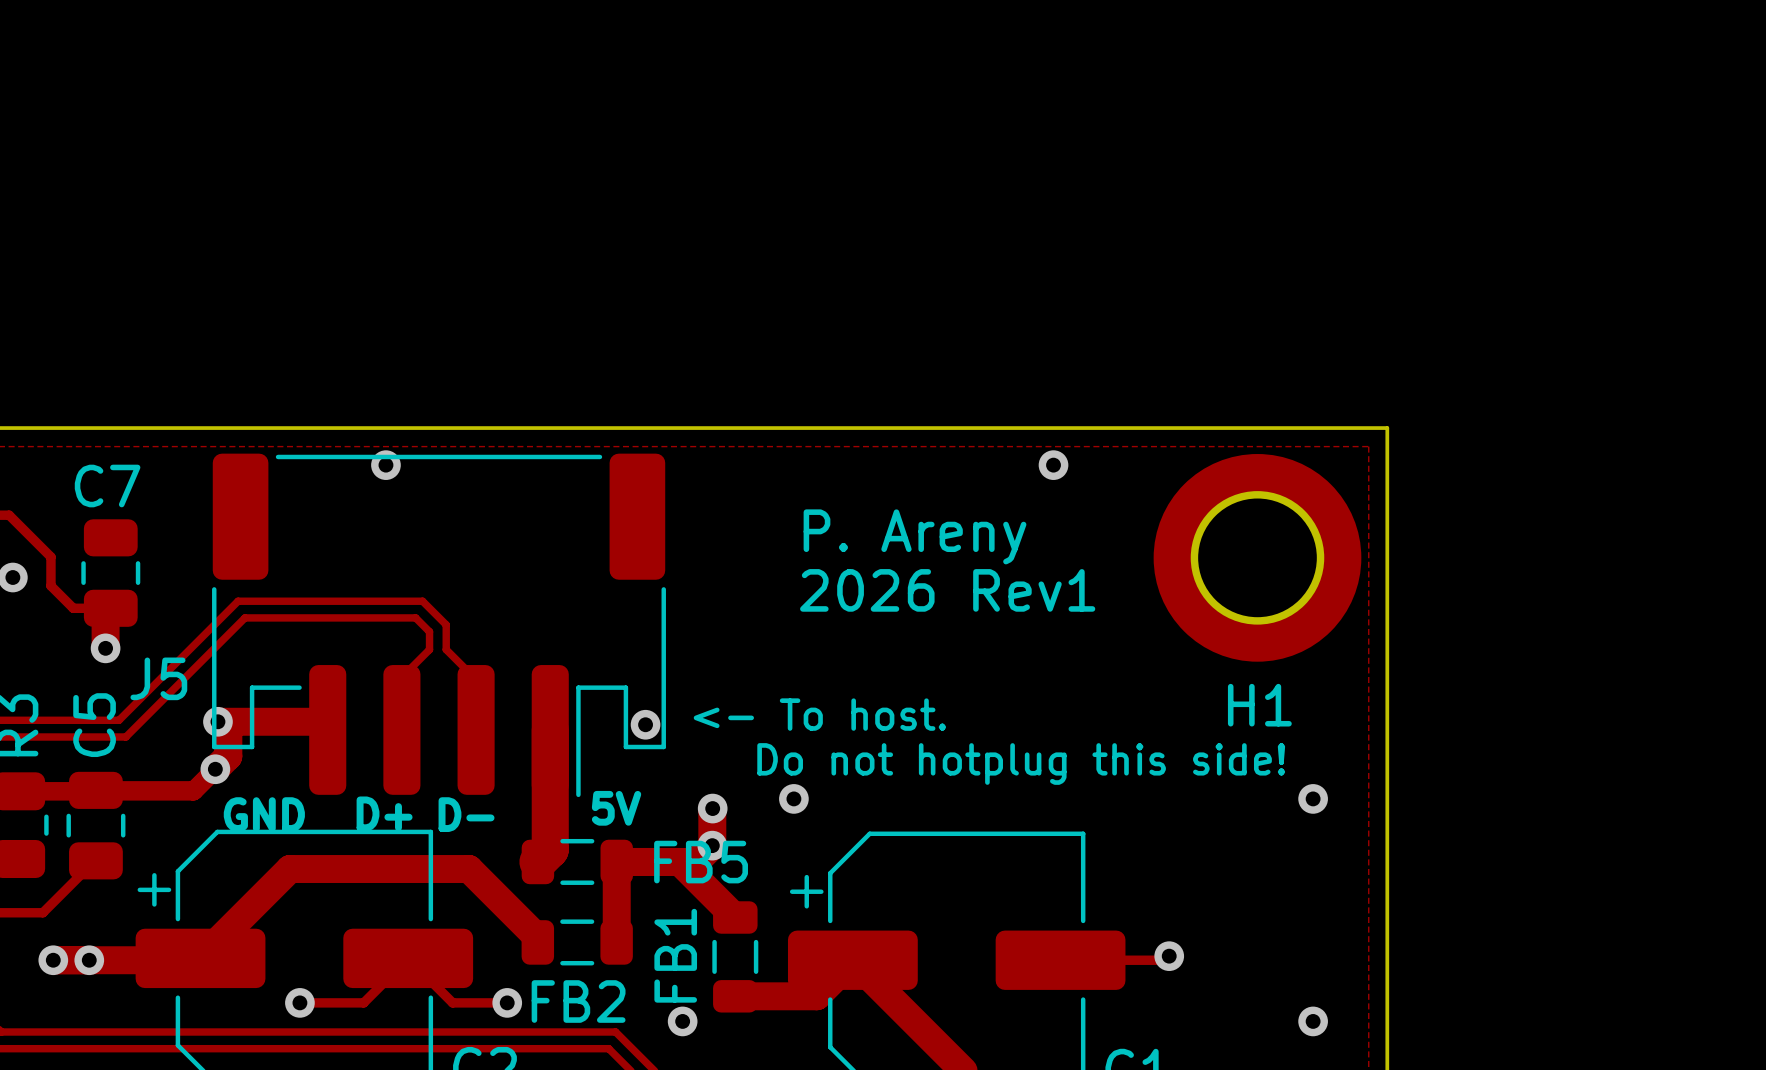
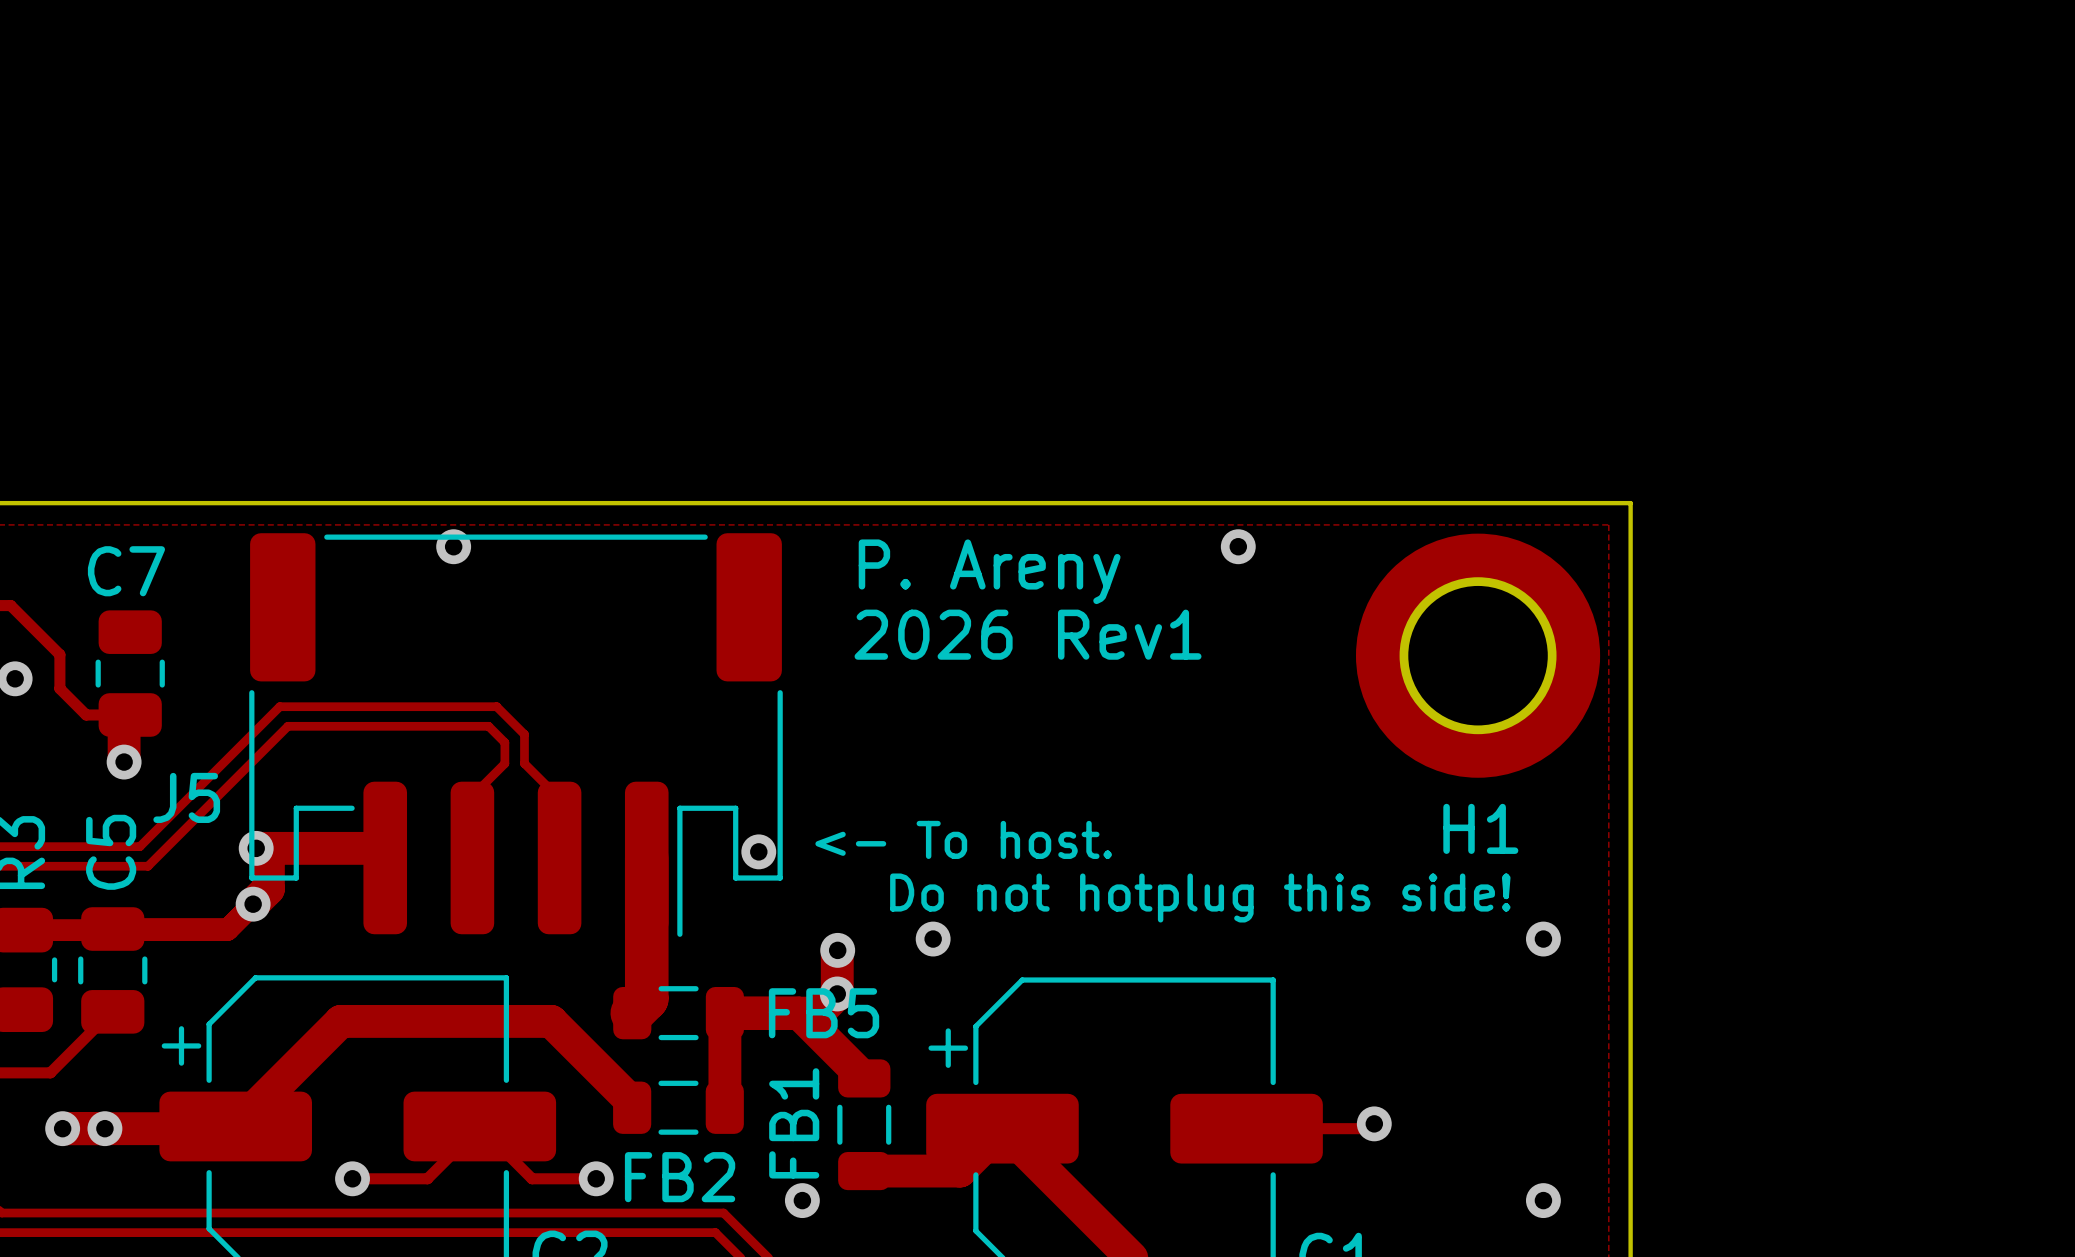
text position: P. Areny (915, 536) -> P. Areny (989, 571)
text position: 2026 Rev1 (947, 590) -> 2026 Rev1 (1028, 634)
text: 5V (616, 808) -> none
text: D+ (384, 813) -> none
text: GND (264, 814) -> none
text: D- (466, 814) -> none

